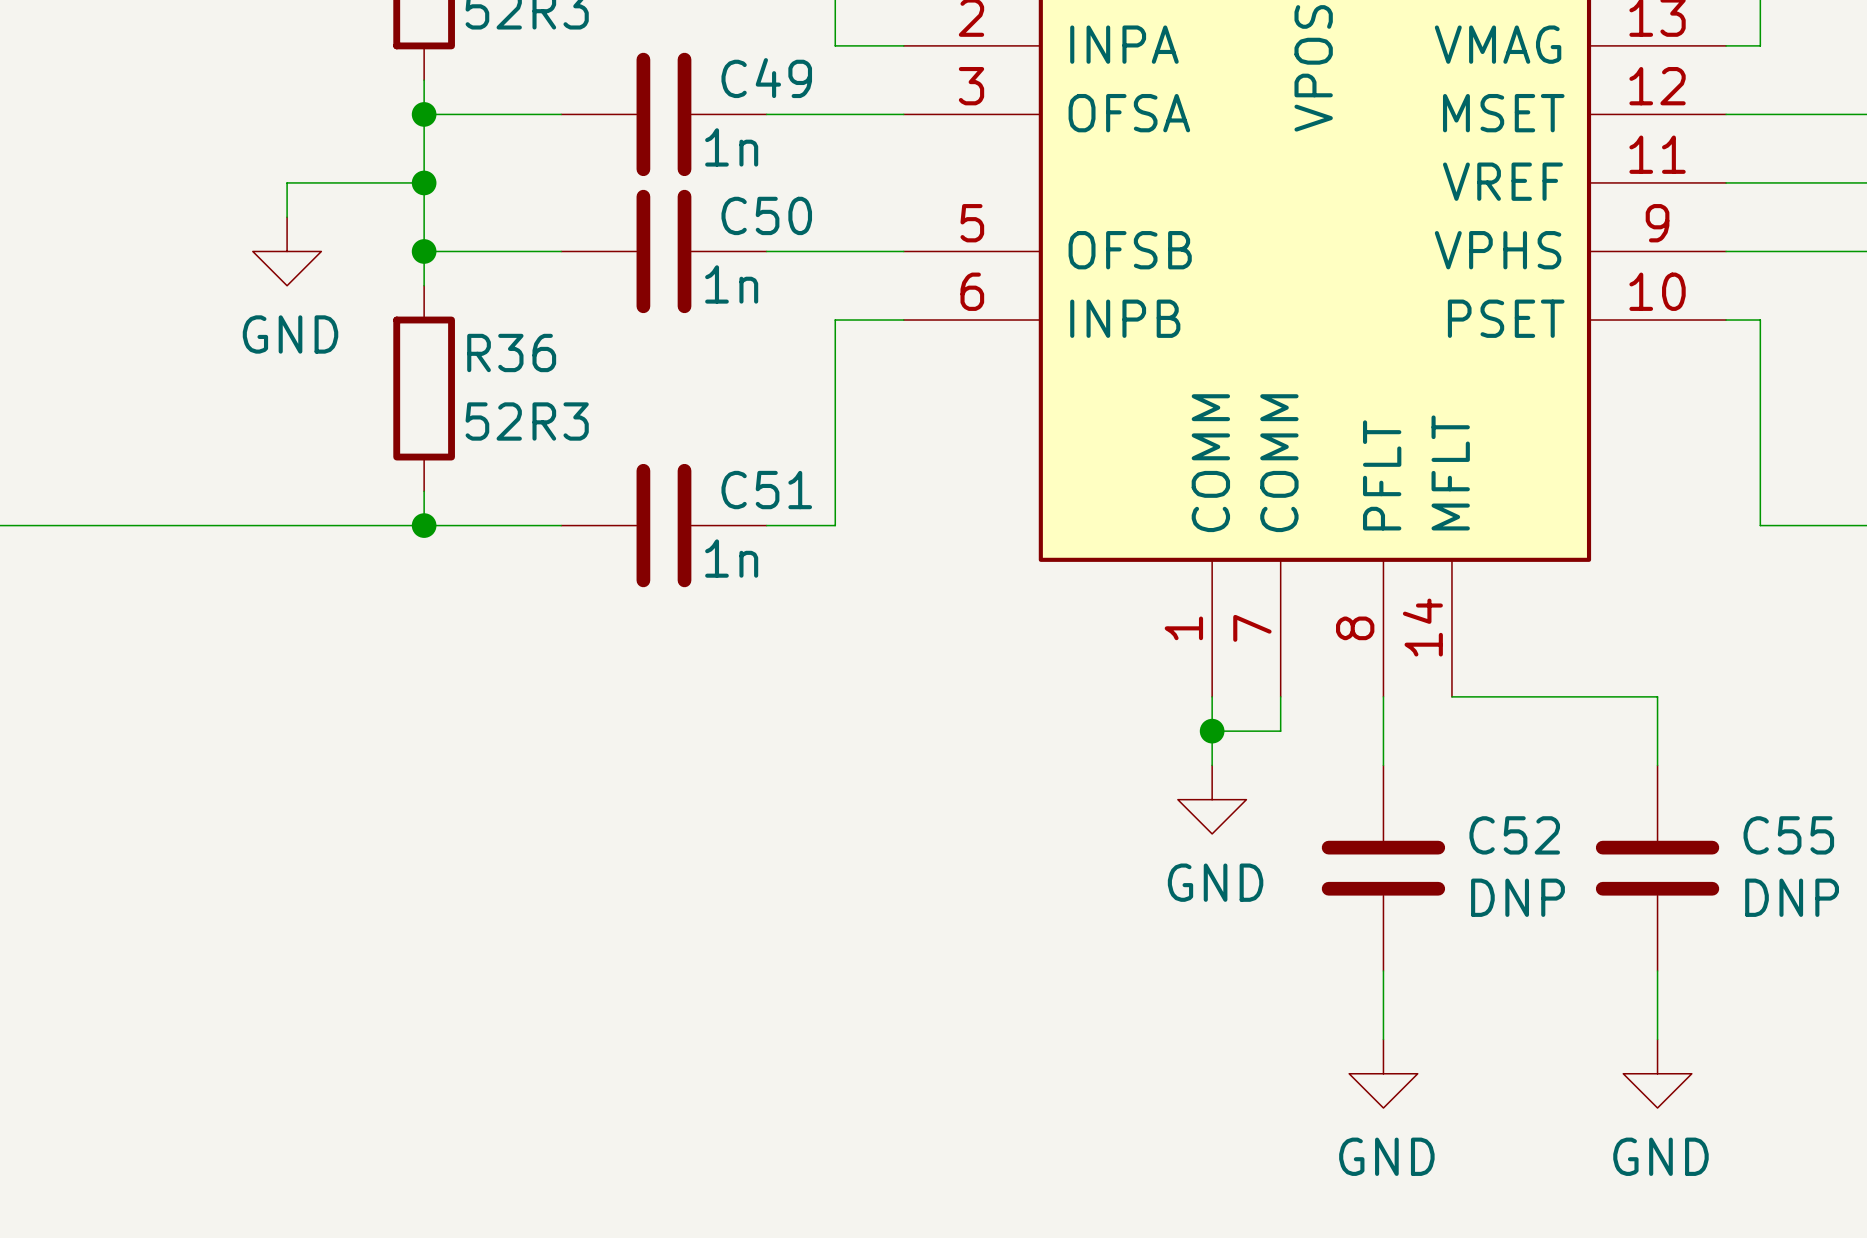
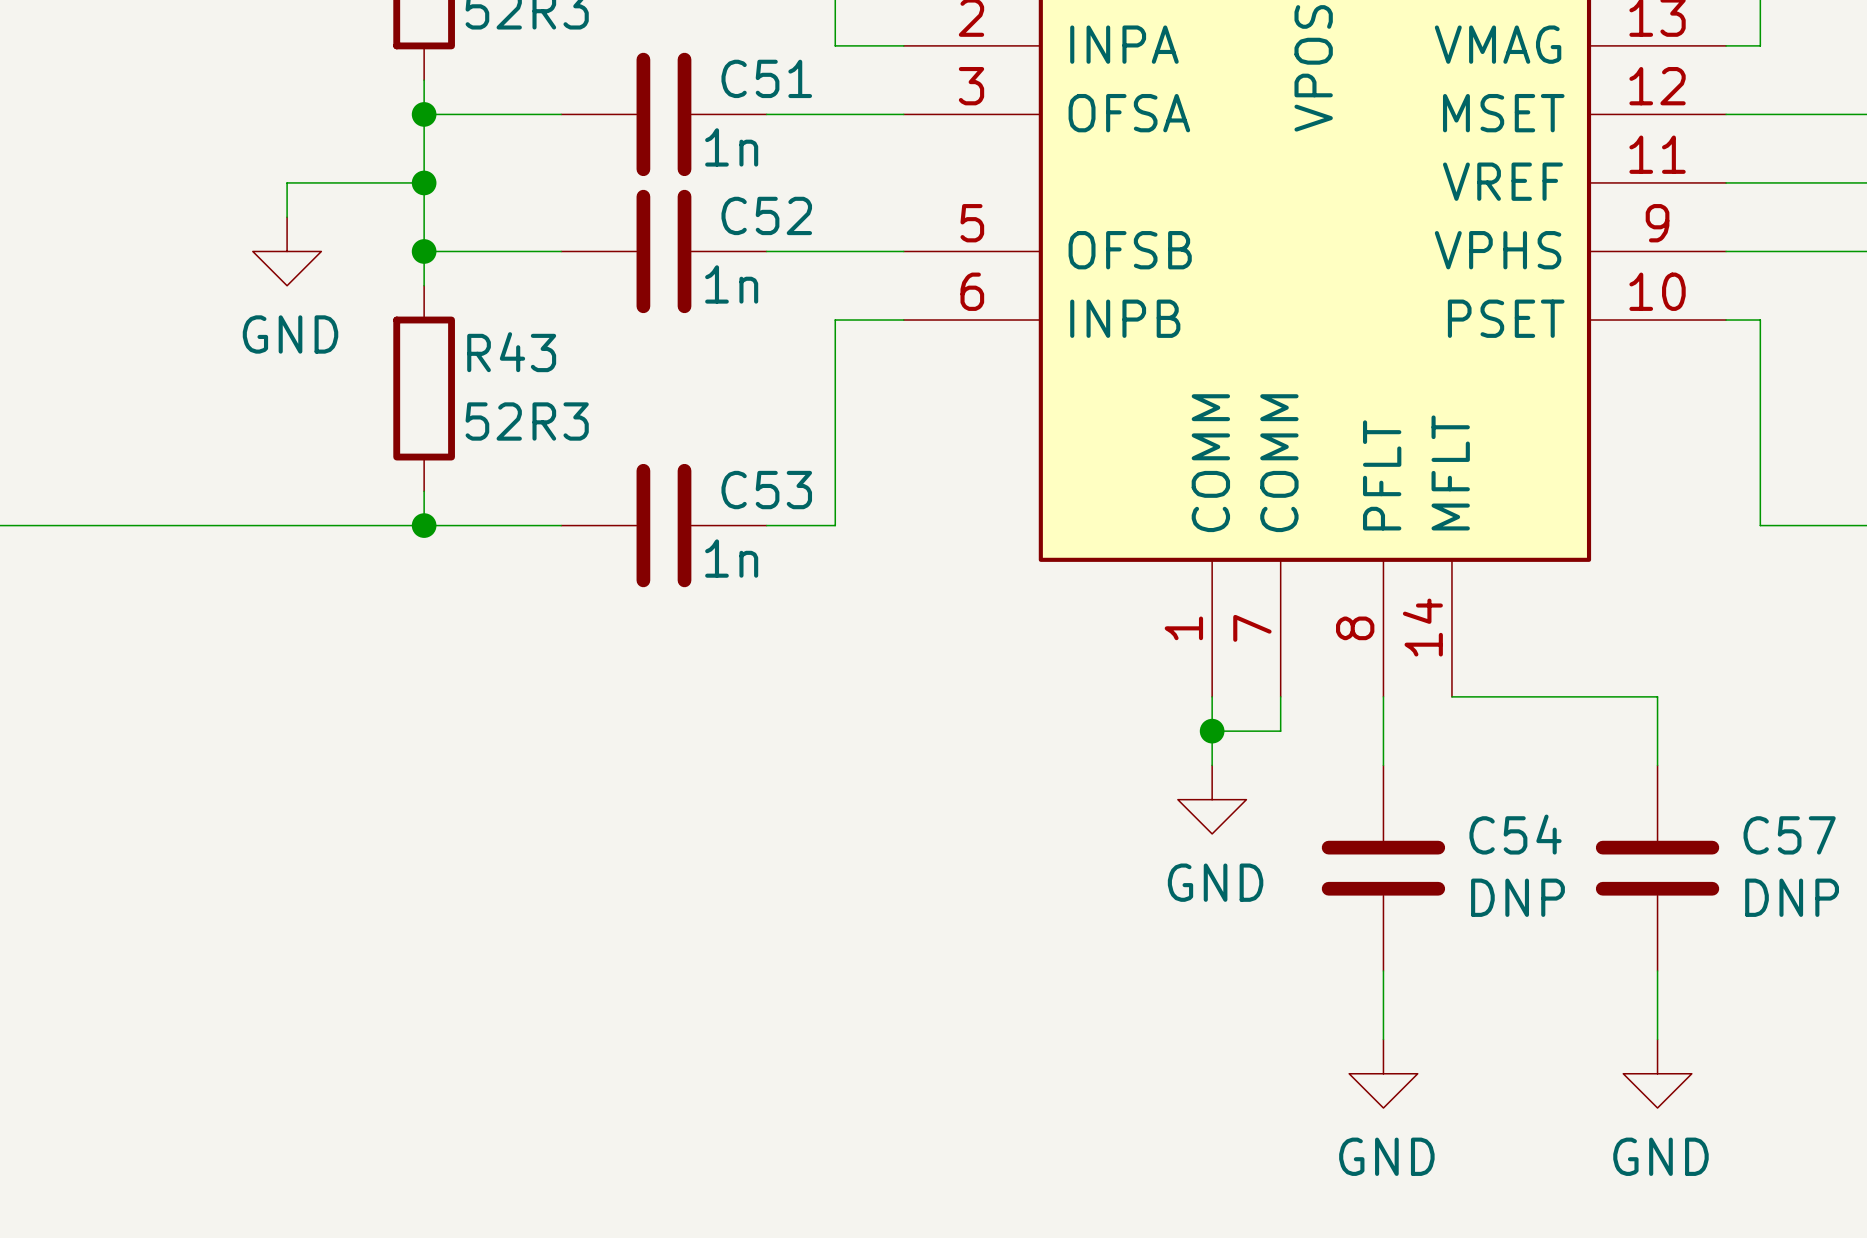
C49 name: C49 (766, 78) -> C51 (766, 78)
C50 name: C50 (766, 215) -> C52 (766, 215)
R36 name: R36 (511, 352) -> R43 (511, 352)
C51 name: C51 (766, 490) -> C53 (766, 490)
C52 name: C52 (1514, 835) -> C54 (1515, 834)
C55 name: C55 (1788, 835) -> C57 (1789, 835)

